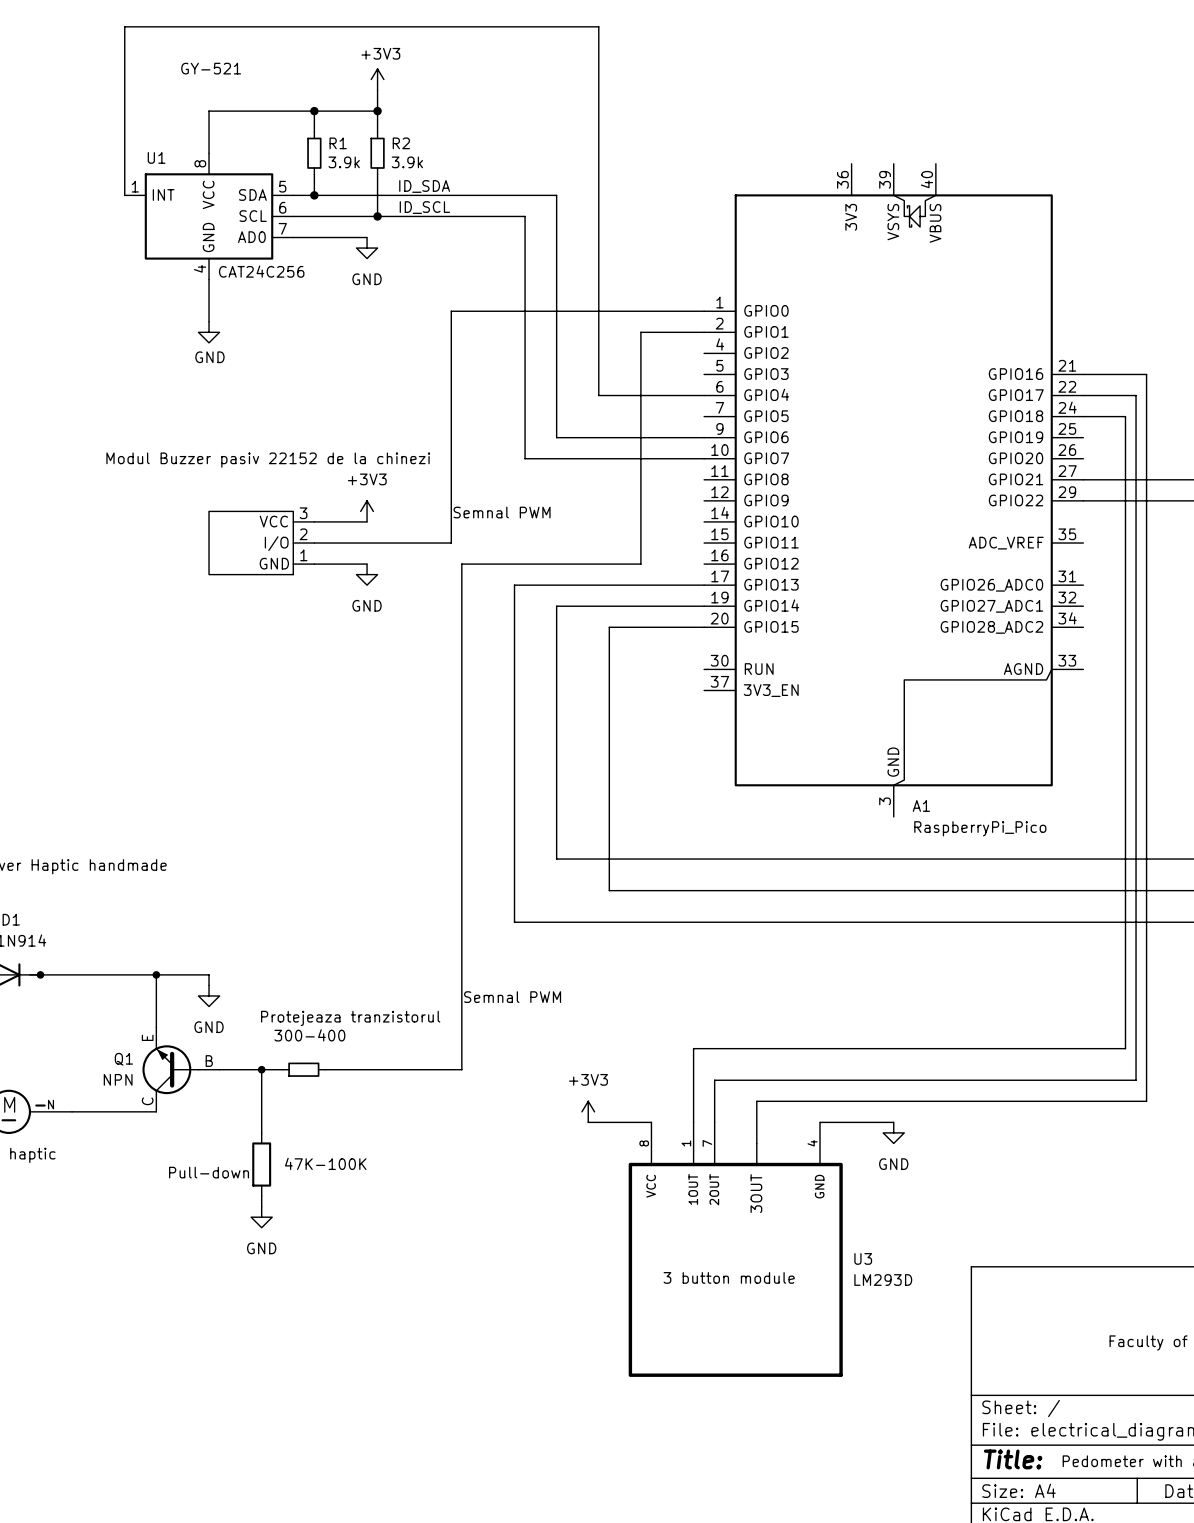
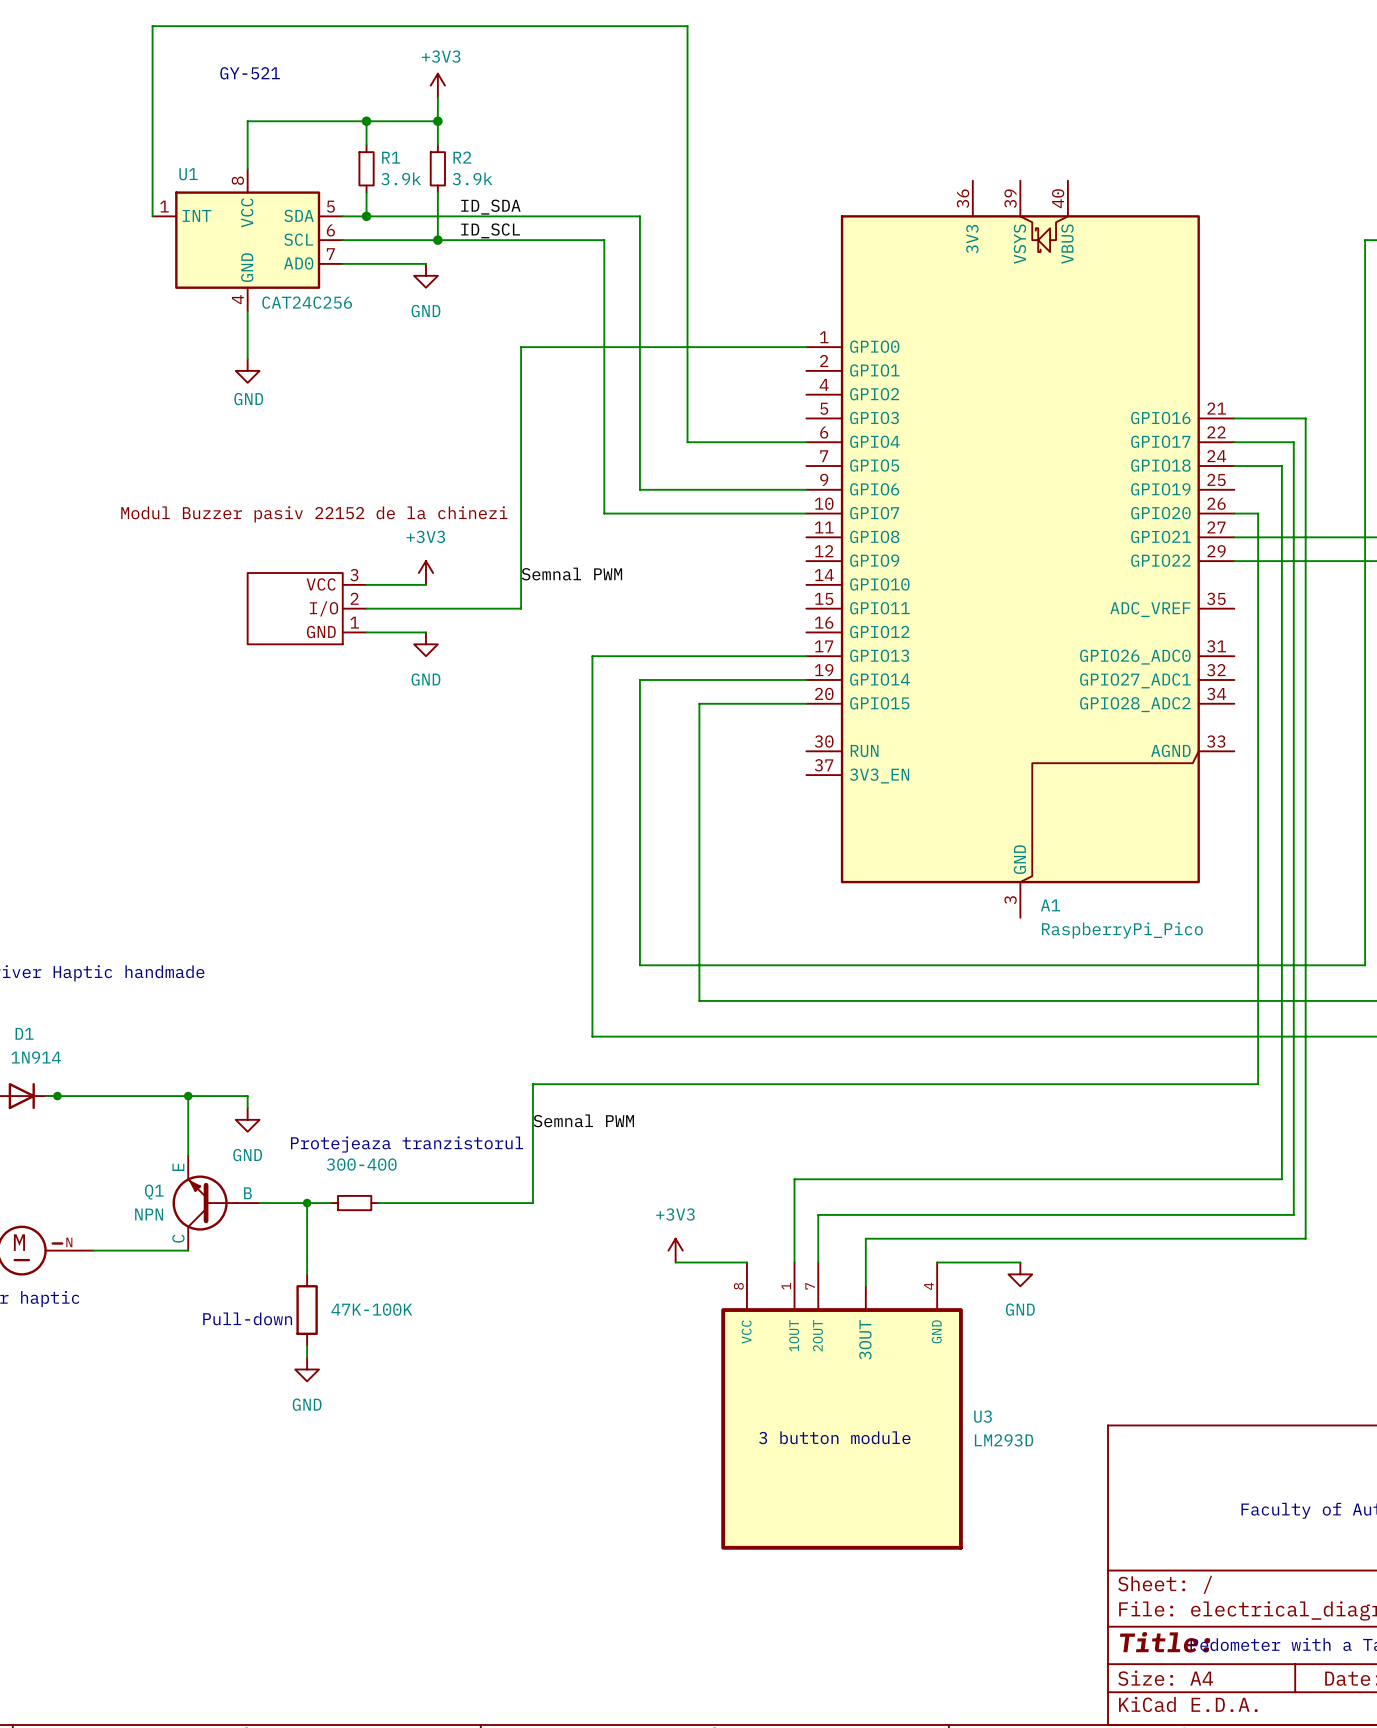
wire: (704, 332) (640, 332) (640, 564) (461, 564) (461, 964) -> (1234, 513) (1258, 513) (1258, 1084) (532, 1084)

